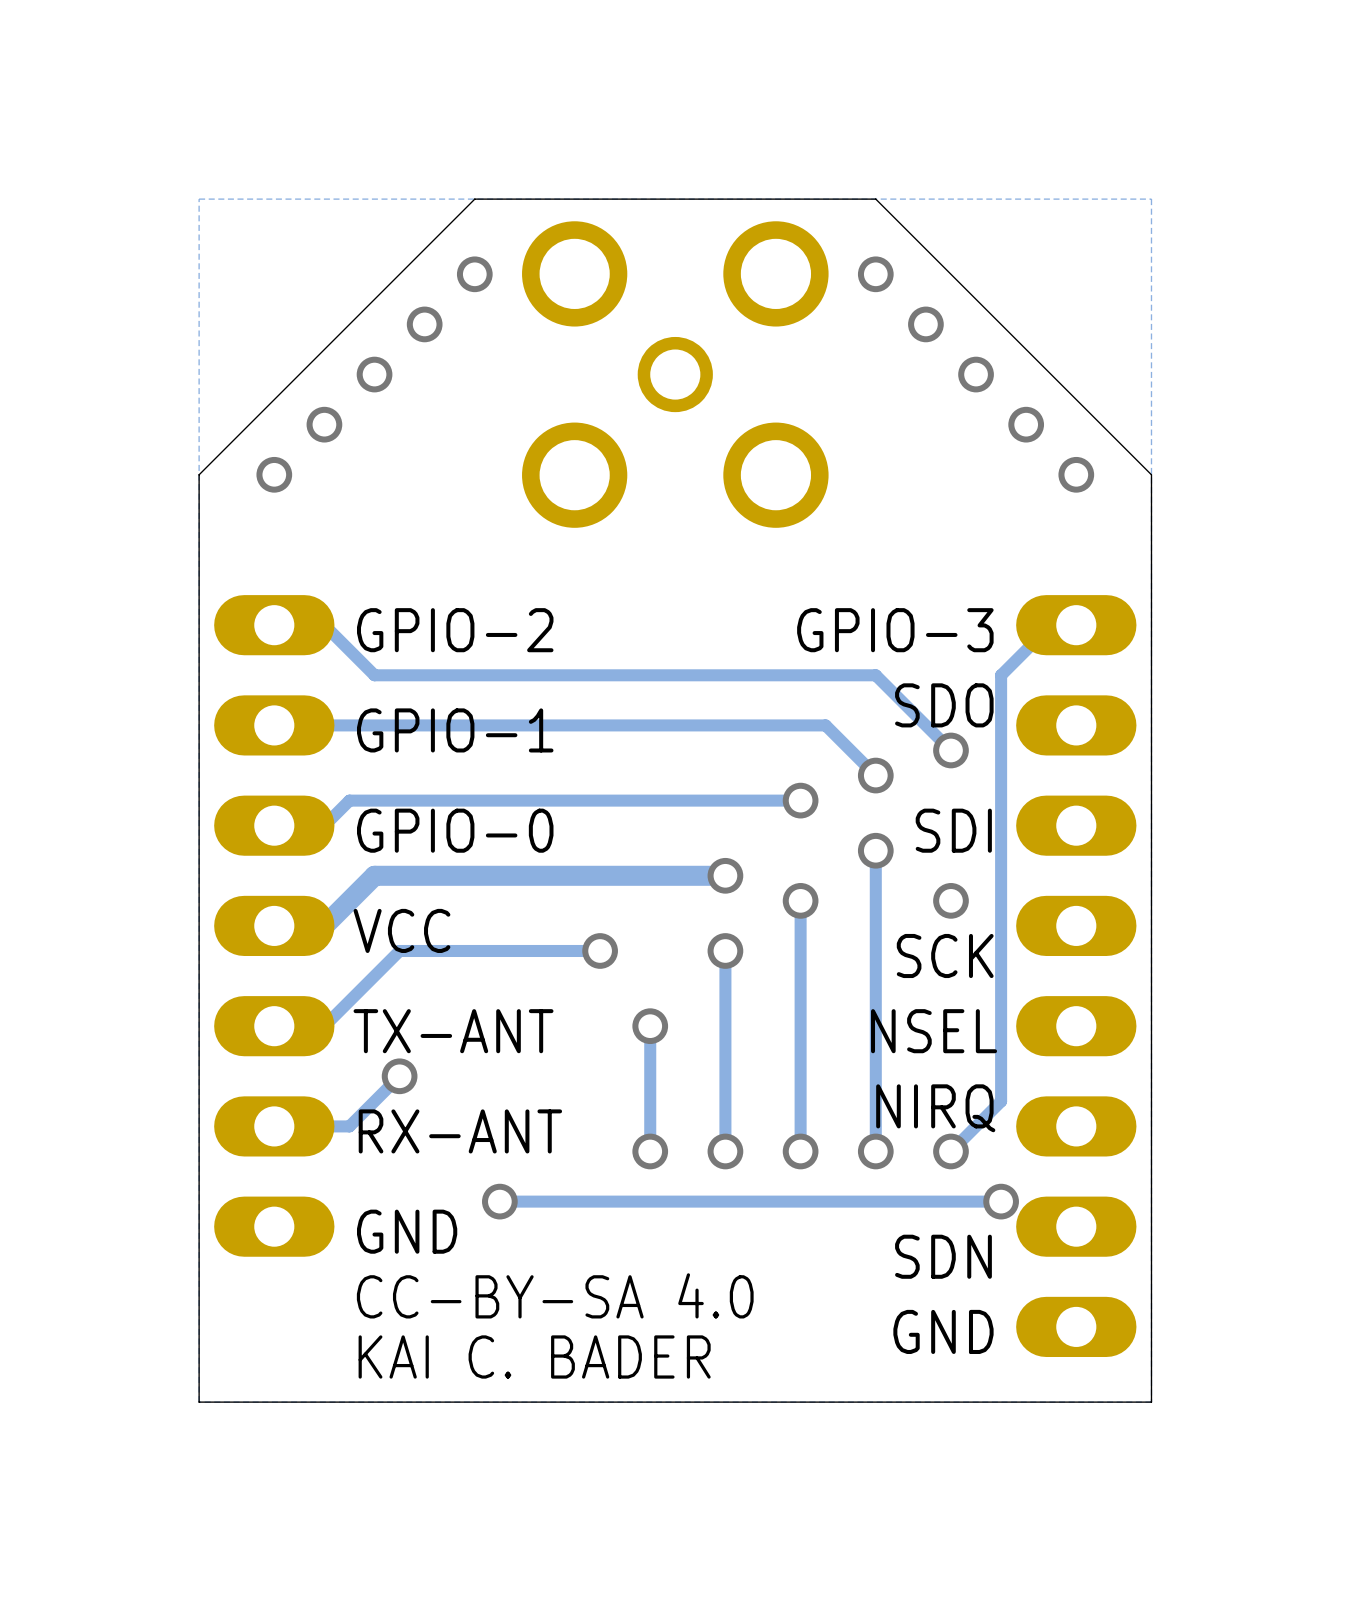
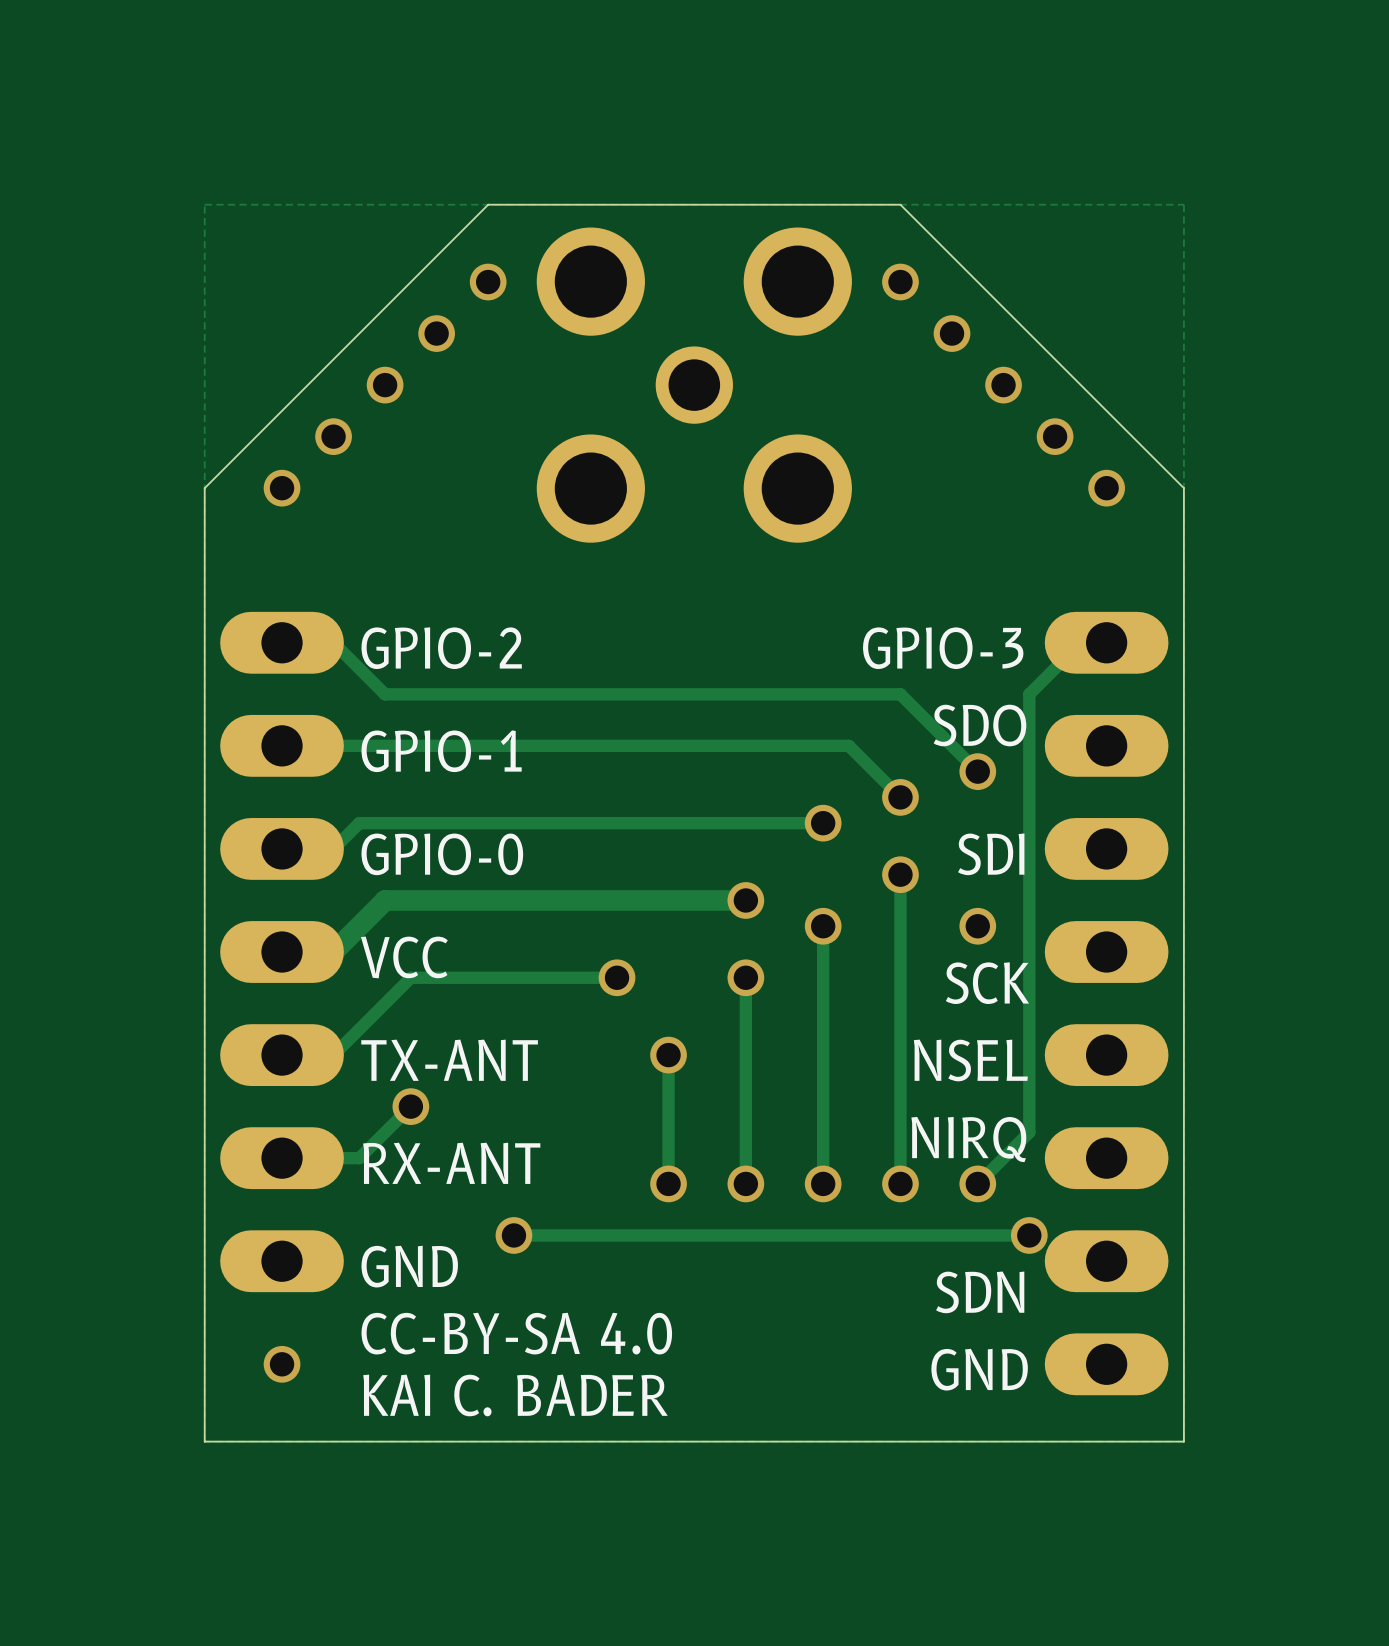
via: none -> (282, 1364)

